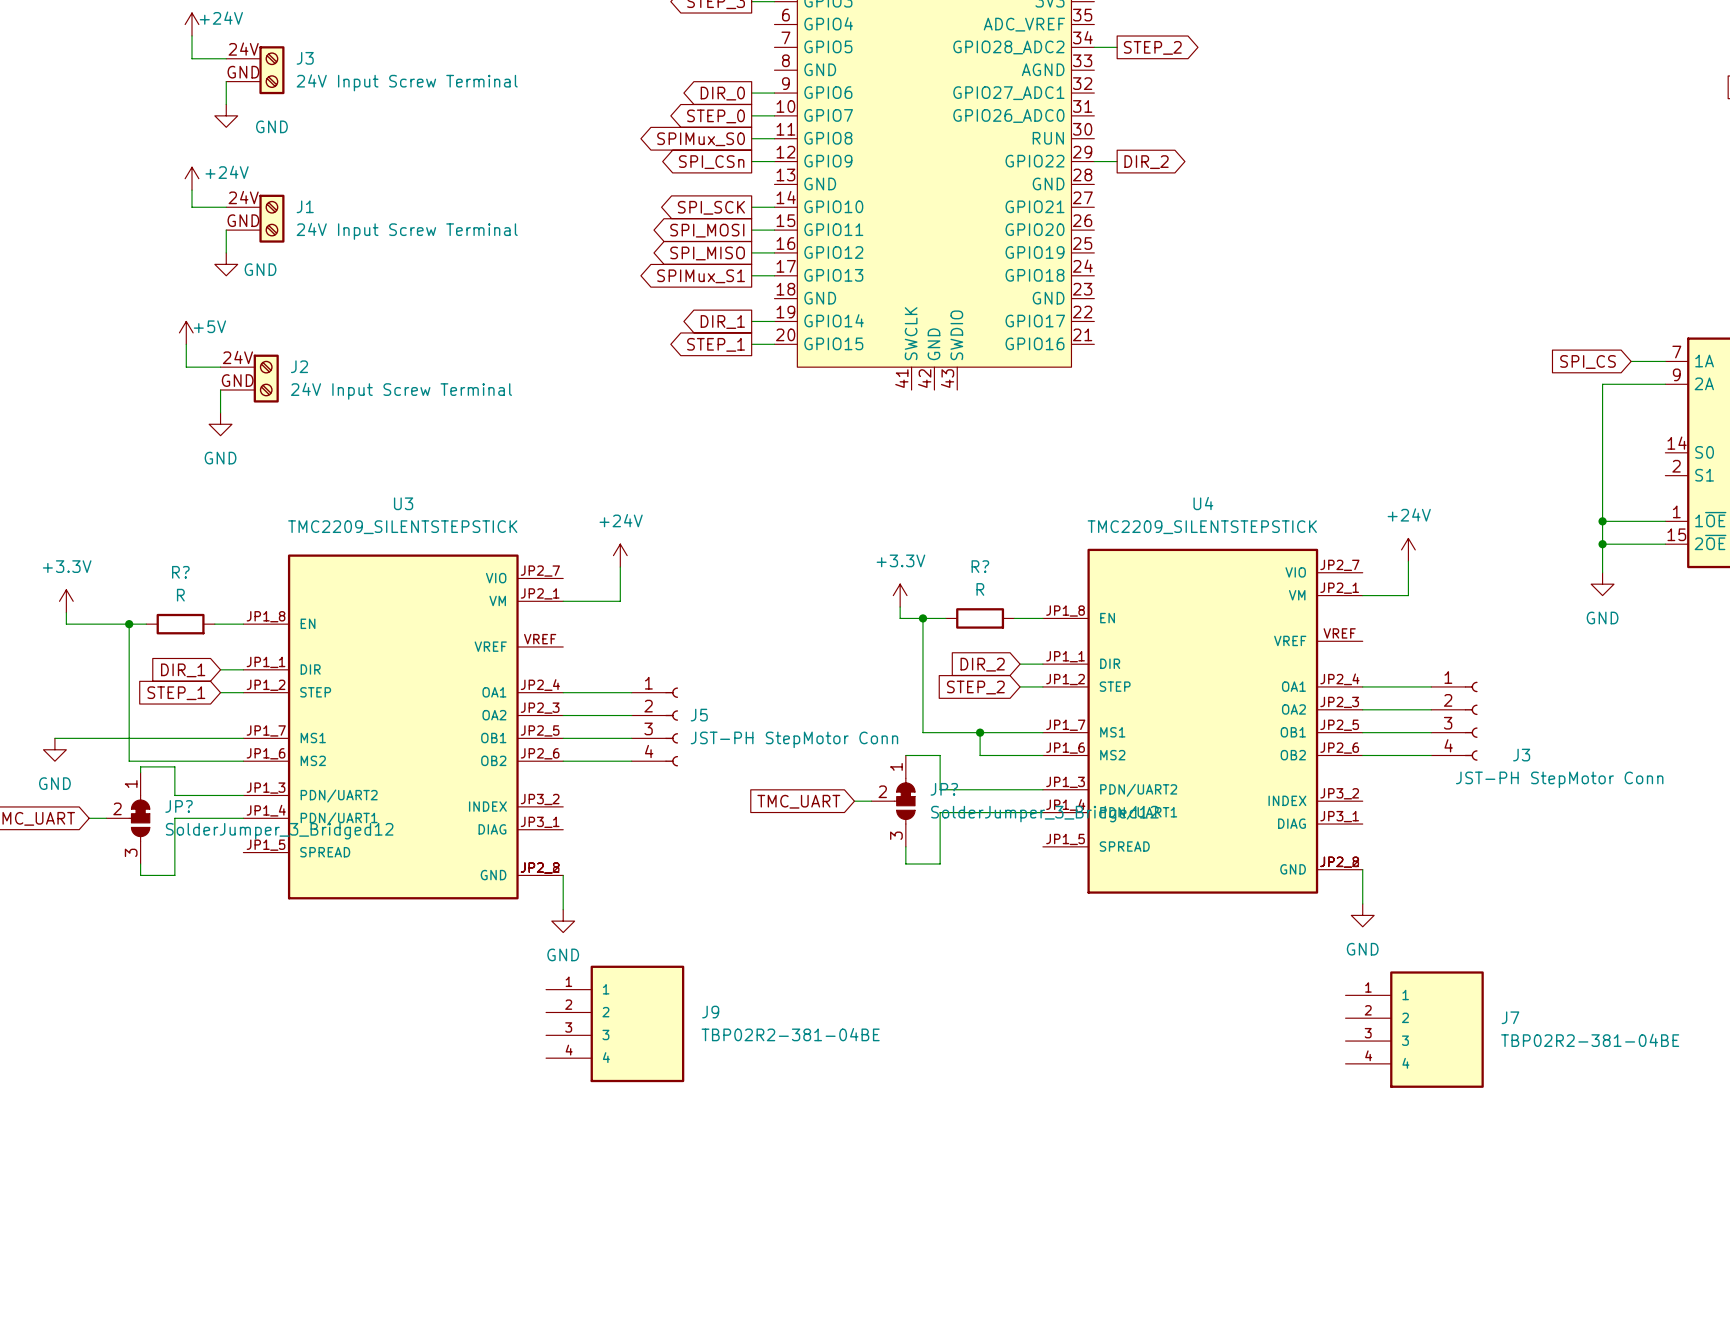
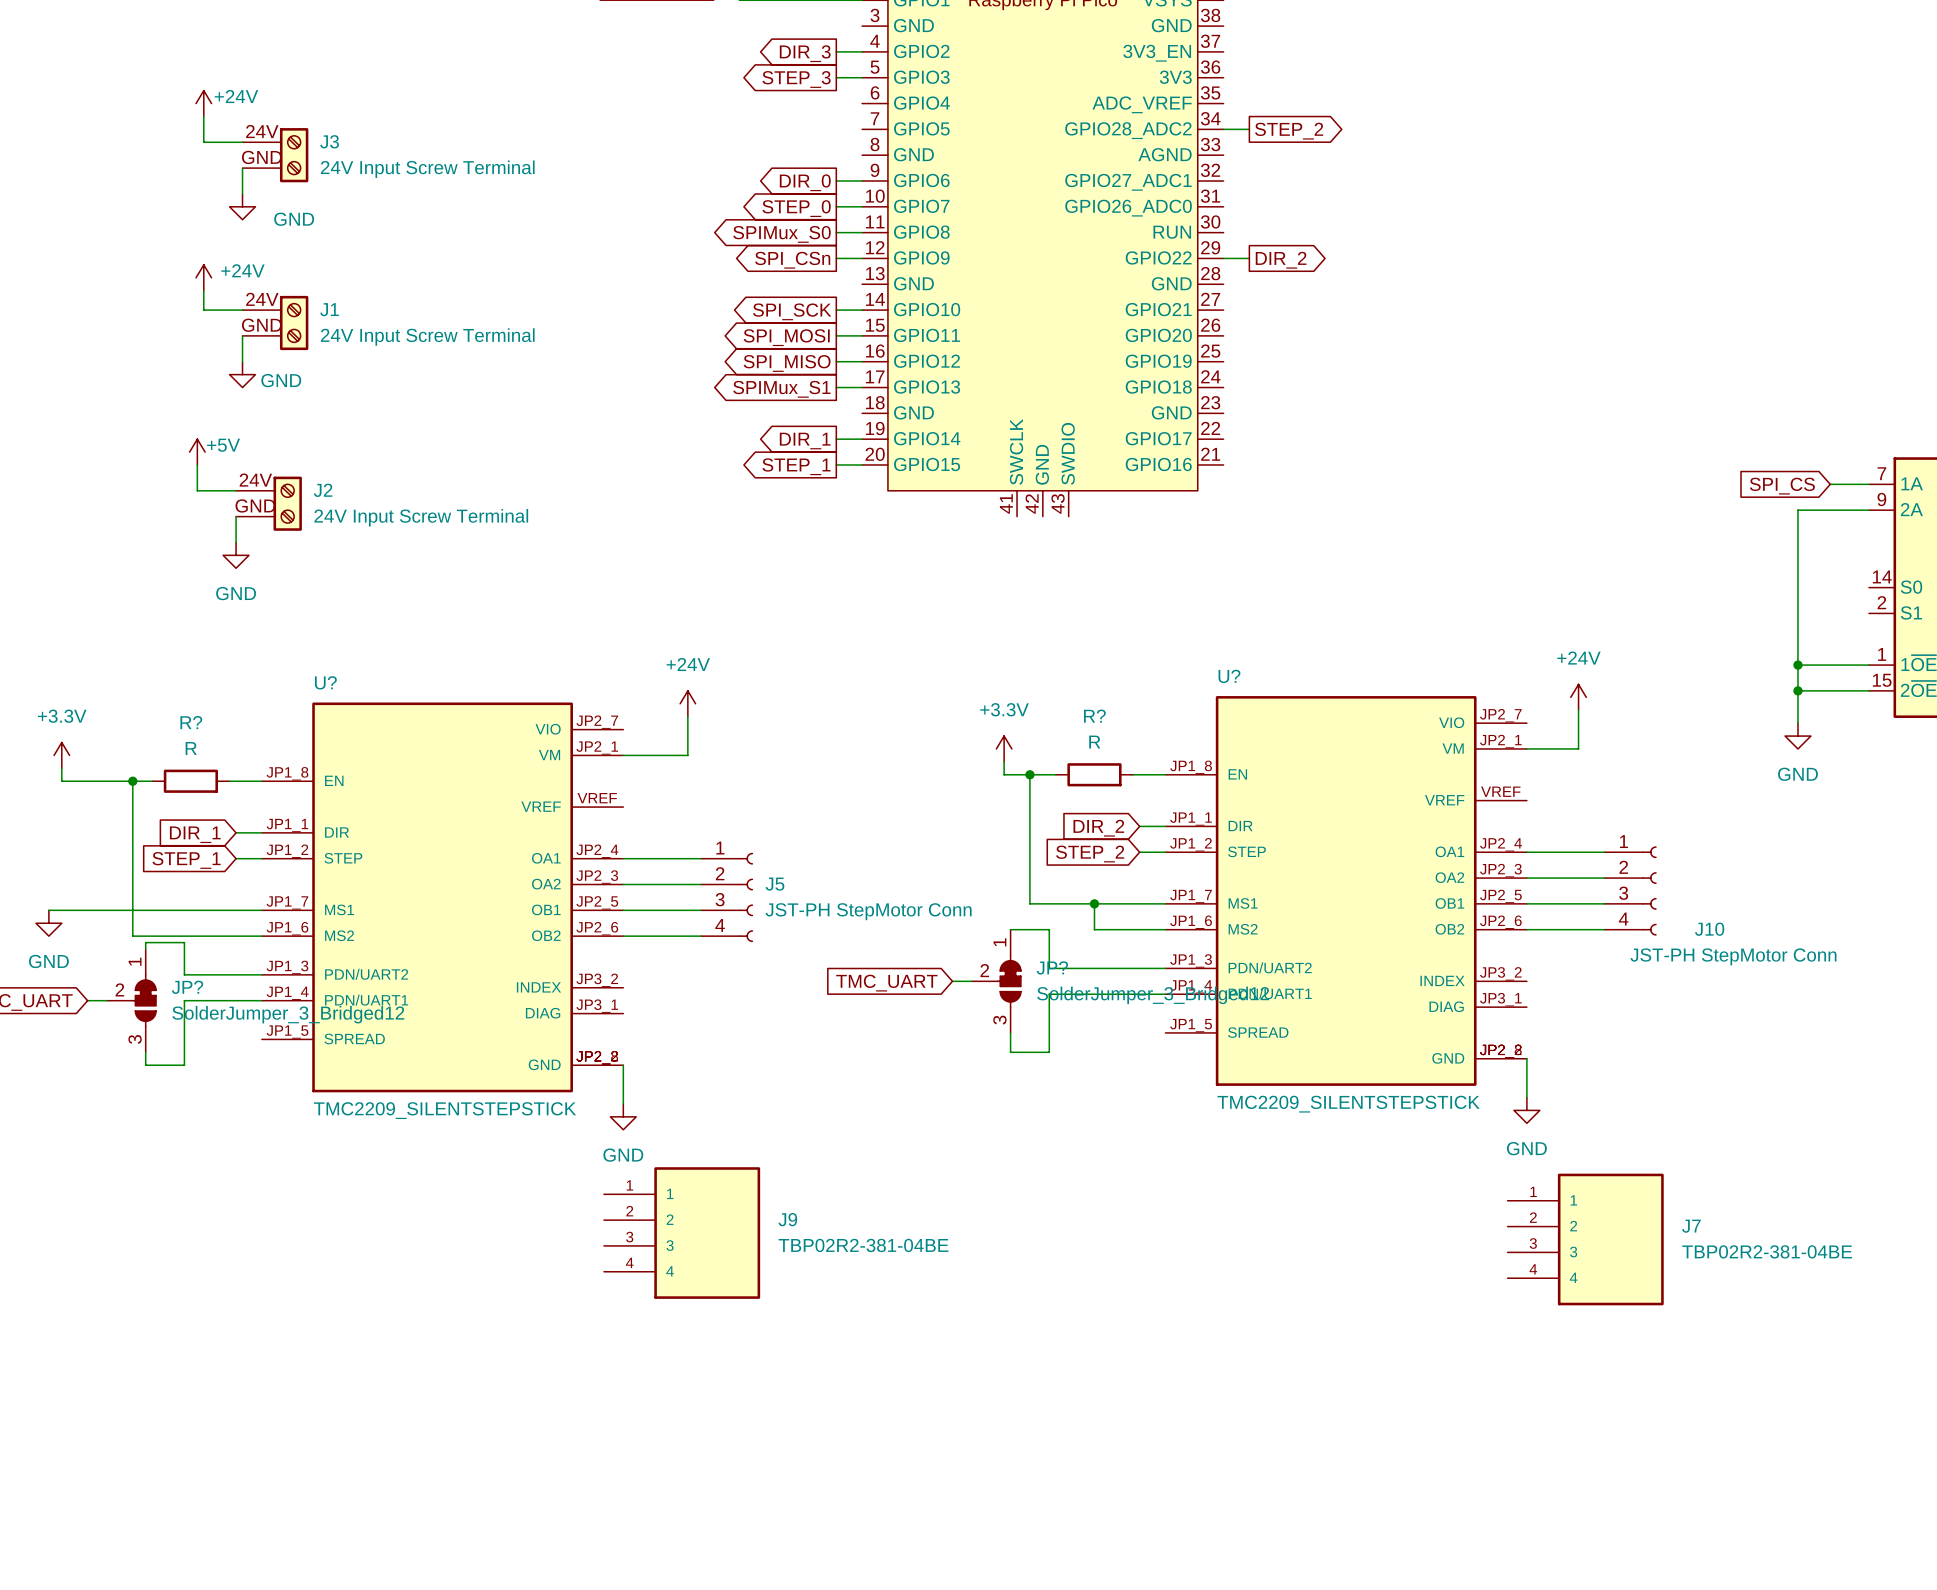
U3 name: U3 (403, 503) -> U? (325, 682)
U4 name: U4 (1203, 503) -> U? (1229, 676)
U3 value position: TMC2209_SILENTSTEPSTICK (402, 527) -> TMC2209_SILENTSTEPSTICK (445, 1110)
U4 value position: TMC2209_SILENTSTEPSTICK (1202, 527) -> TMC2209_SILENTSTEPSTICK (1348, 1104)
J3 name: J3 (1521, 755) -> J10 (1709, 929)

